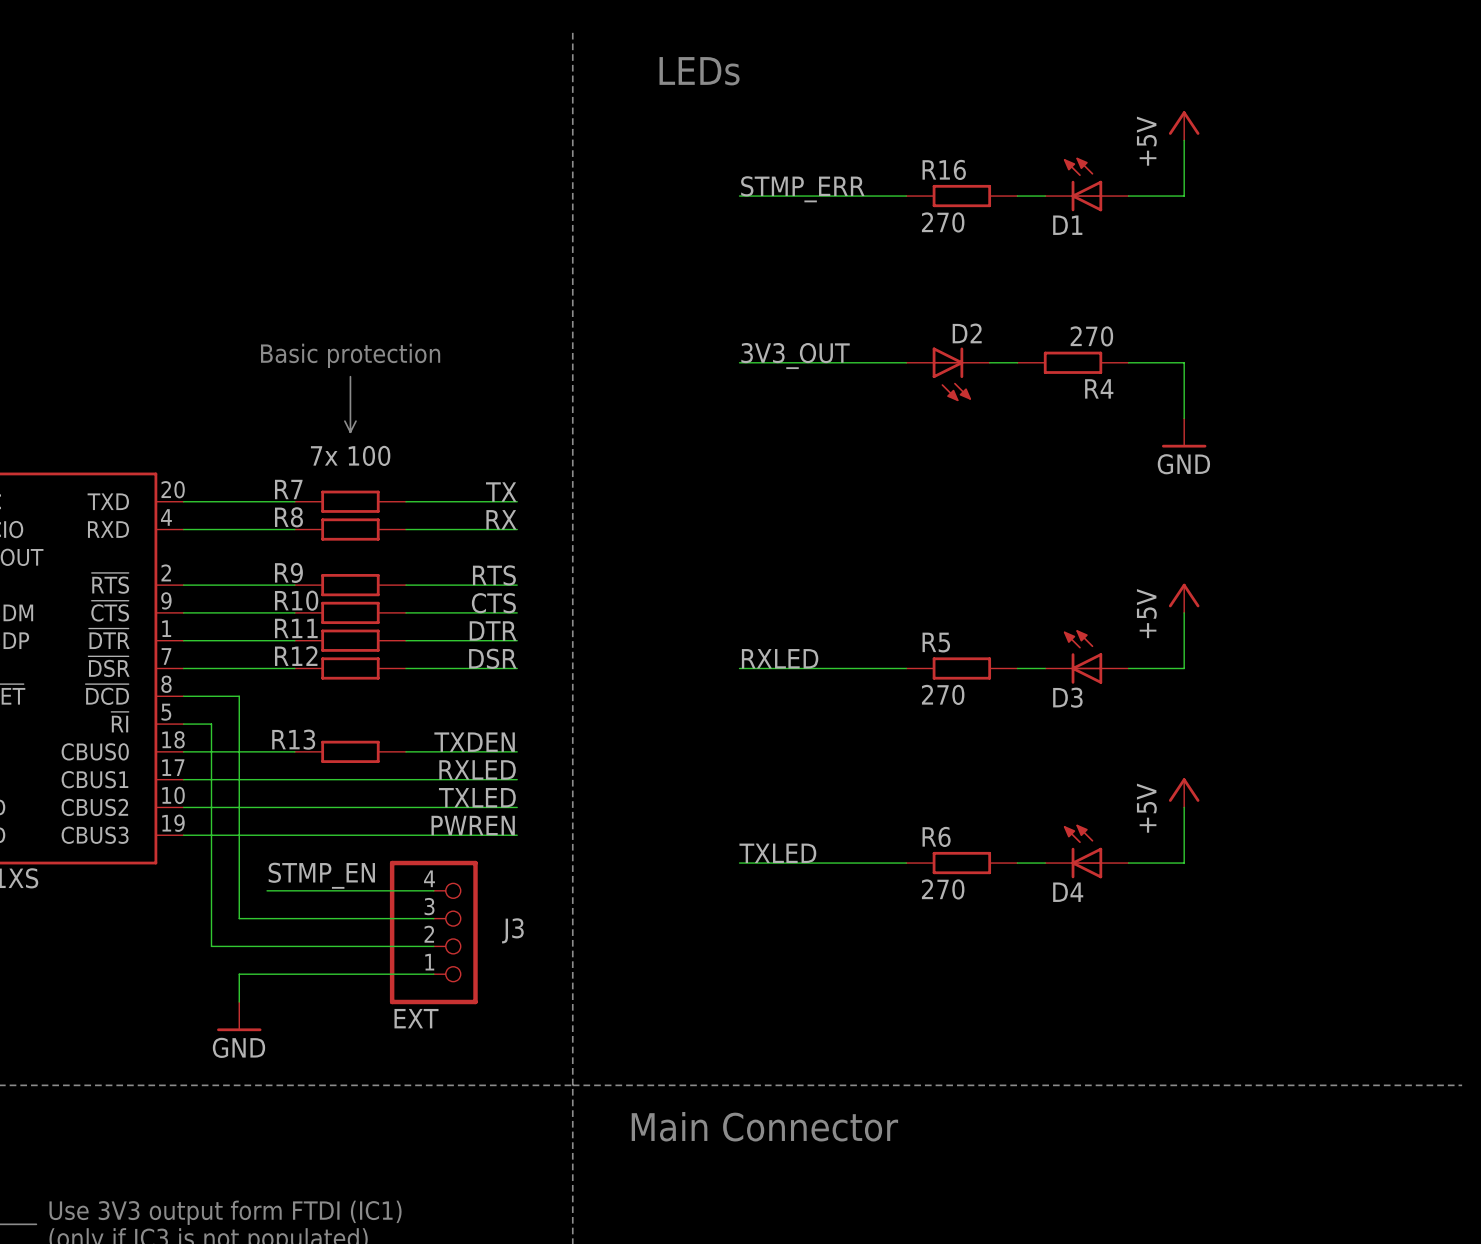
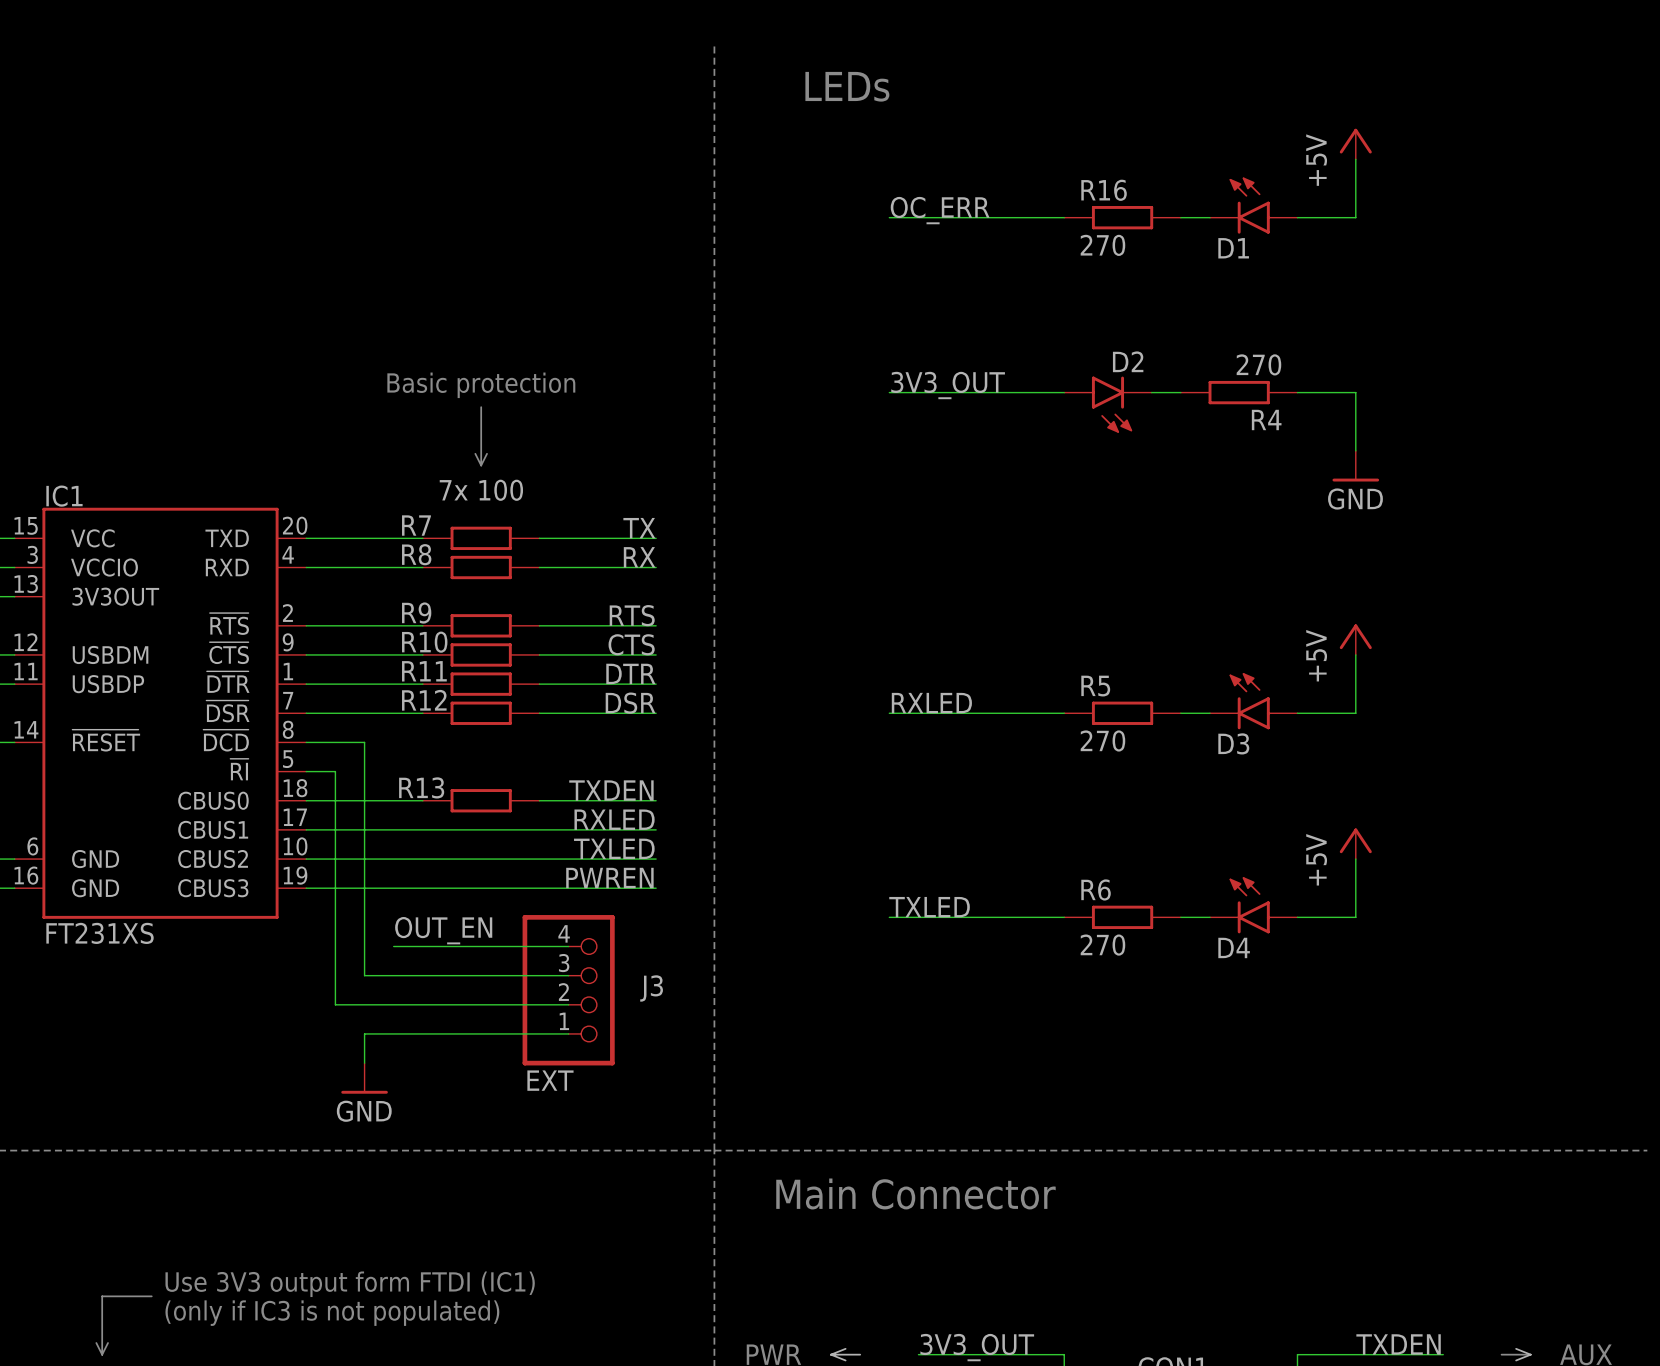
D1 symbol: [1045, 157, 1129, 212] -> [1210, 177, 1298, 234]
label: STMP_ERR (802, 189) -> OC_ERR (940, 210)
D2 symbol: [906, 347, 990, 402] -> [1064, 376, 1152, 433]
D3 symbol: [1045, 630, 1129, 684] -> [1210, 673, 1298, 730]
D4 symbol: [1045, 824, 1129, 879] -> [1210, 877, 1298, 934]
label: STMP_EN (321, 875) -> OUT_EN (443, 930)

